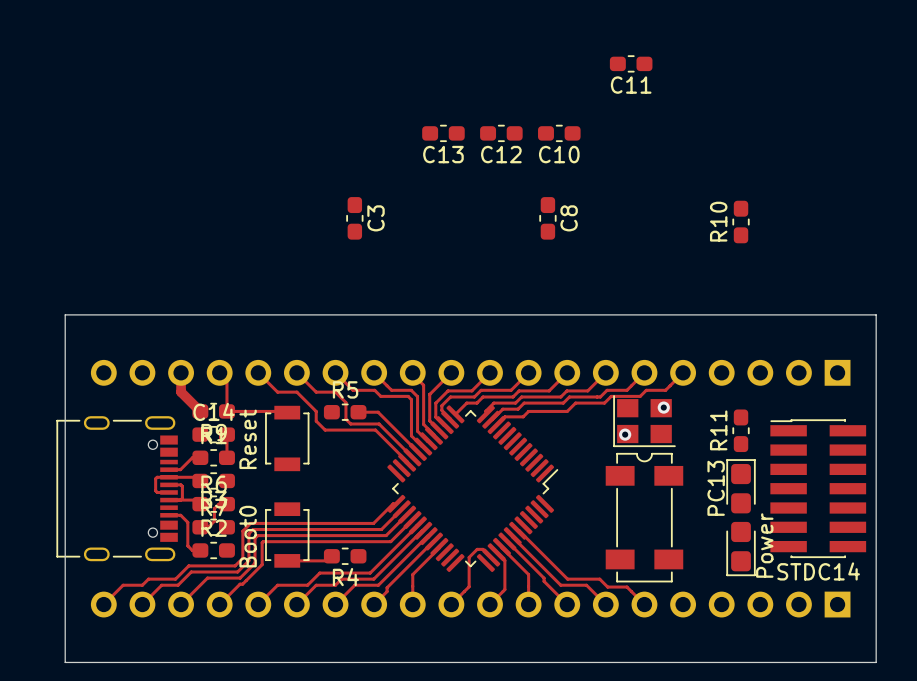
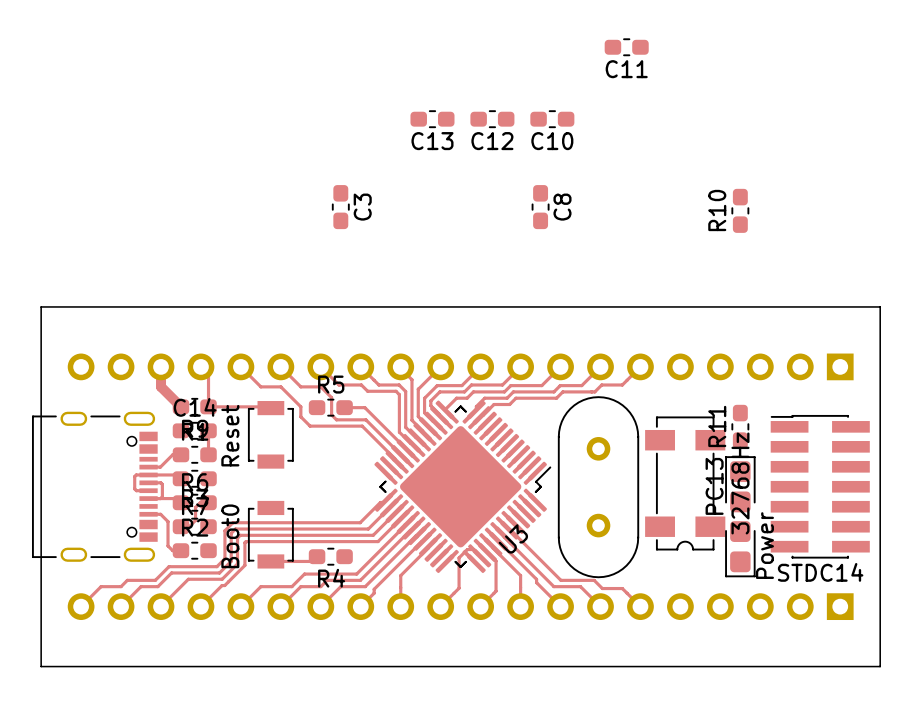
track: (683, 372) (665, 390) (646, 390) (640, 396) (611, 396) (604, 403) (575, 403) (567, 411) (528, 411) (523, 416) (504, 416) (496, 425) -> none
via: (663, 407) -> none
part: (644, 421) -> none
via: (625, 434) -> none
part: none -> 32768Hz (685, 483)
U3: none -> (460, 486)
part: none -> (598, 487)
part: (644, 517) -> none

